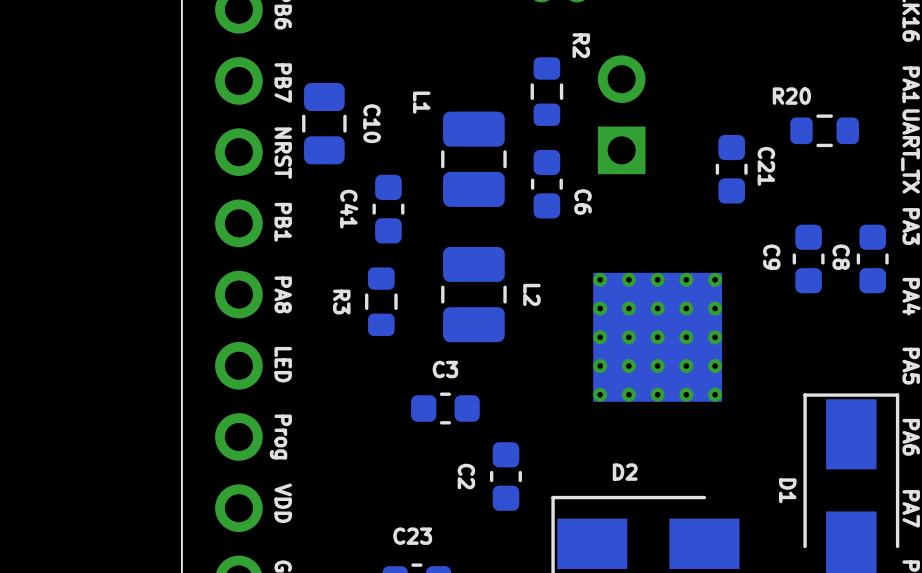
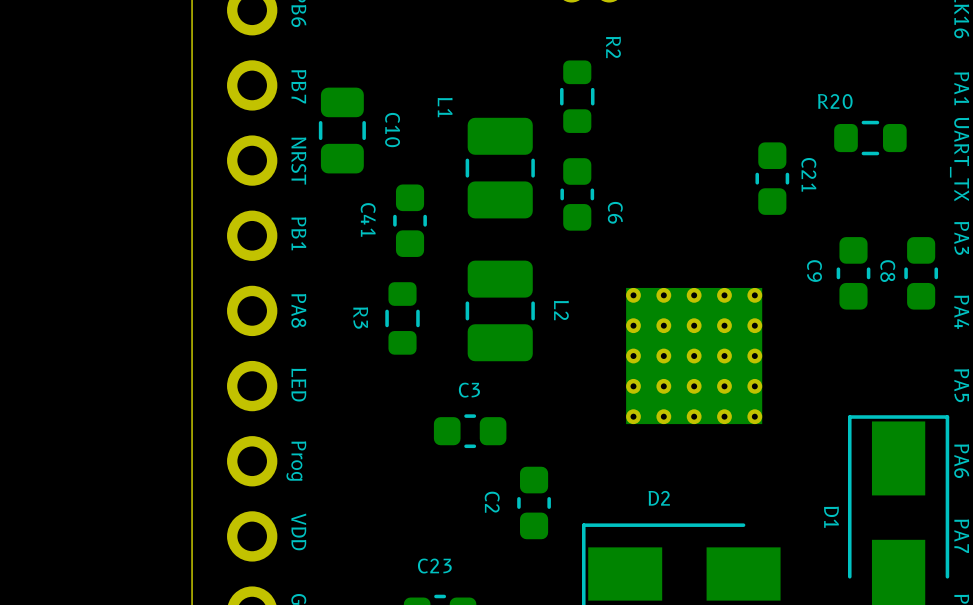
part: (621, 114) -> none

